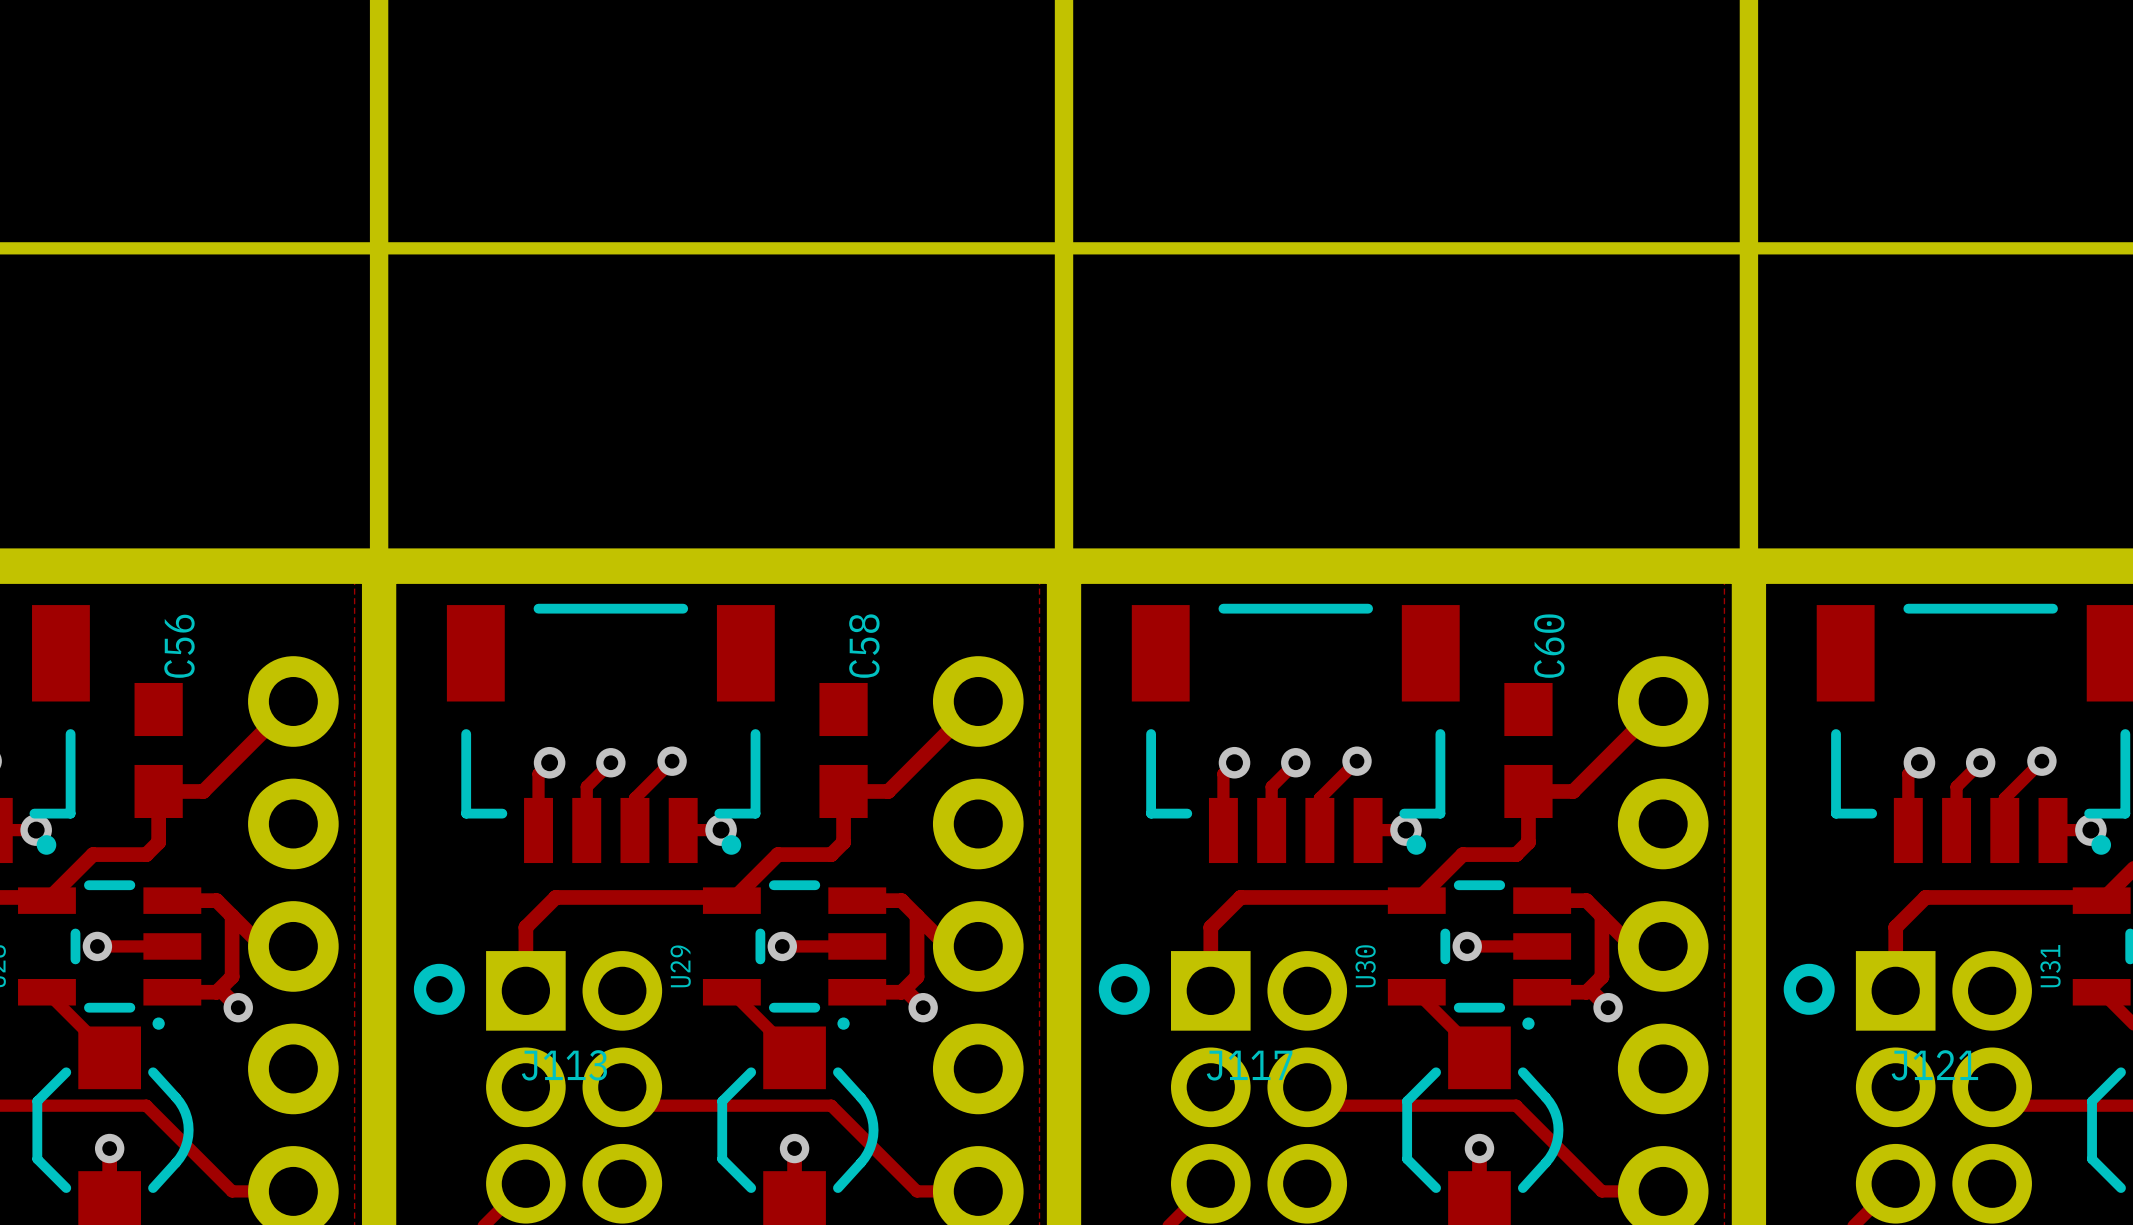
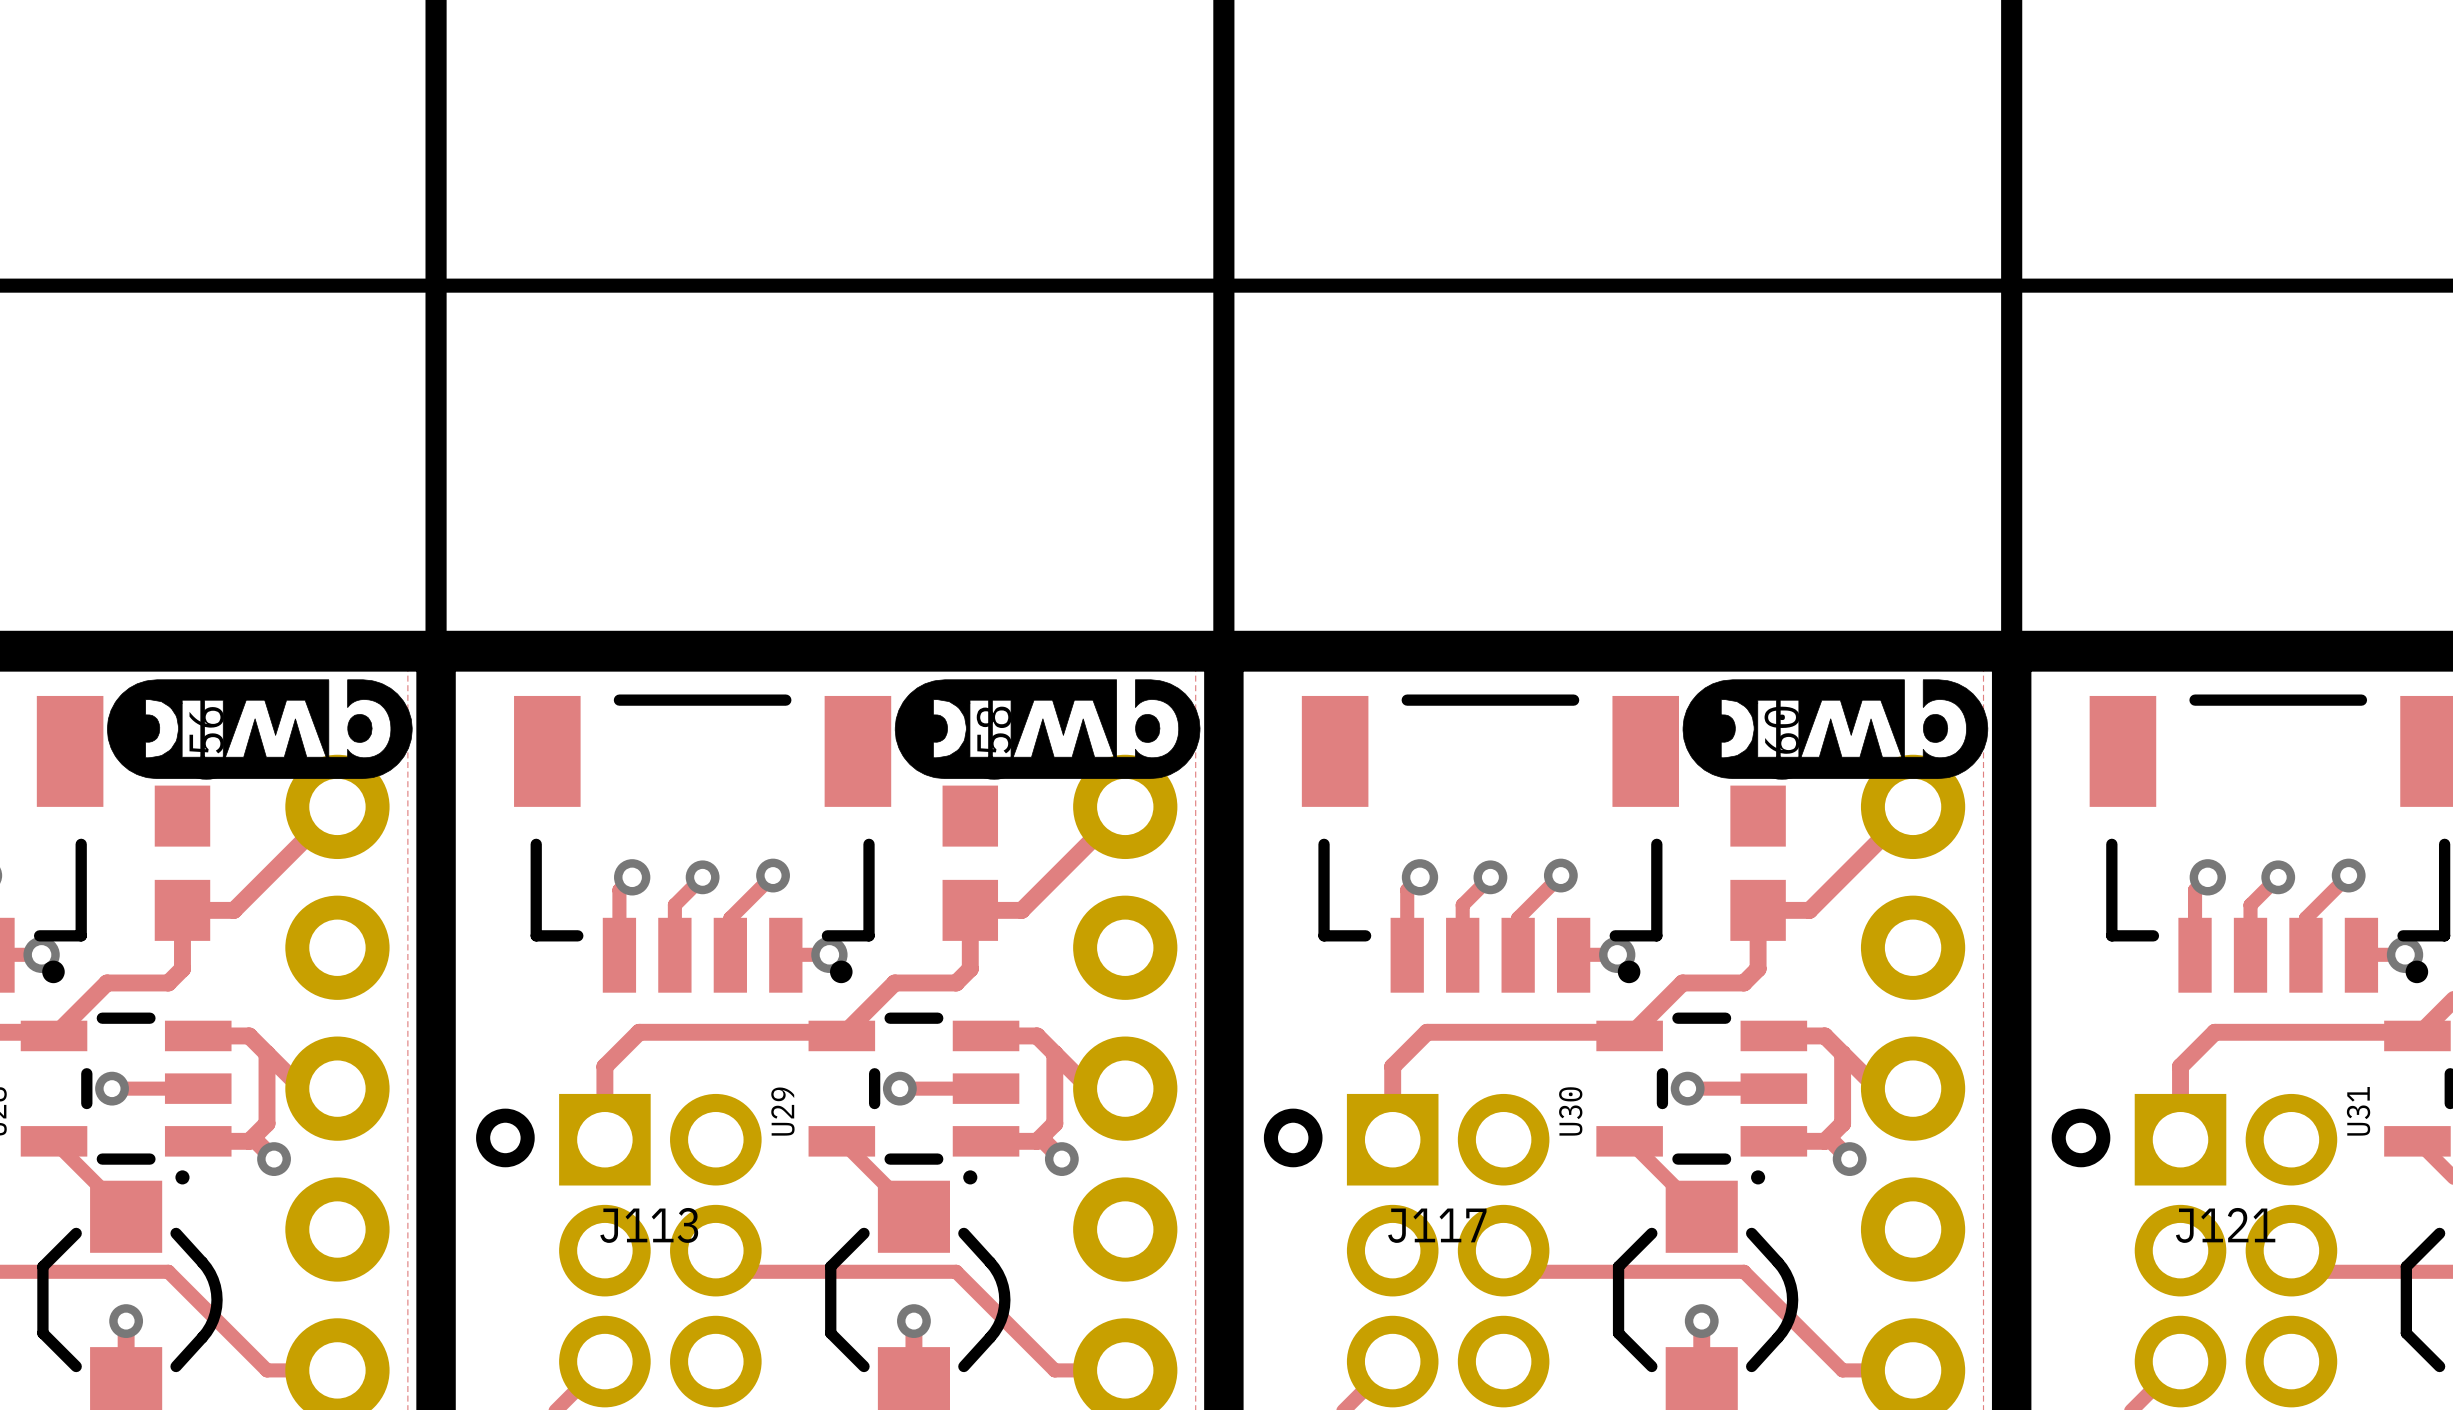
drawing: none -> [107, 679, 413, 780]
drawing: none -> [894, 679, 1201, 780]
drawing: none -> [1682, 679, 1989, 780]

